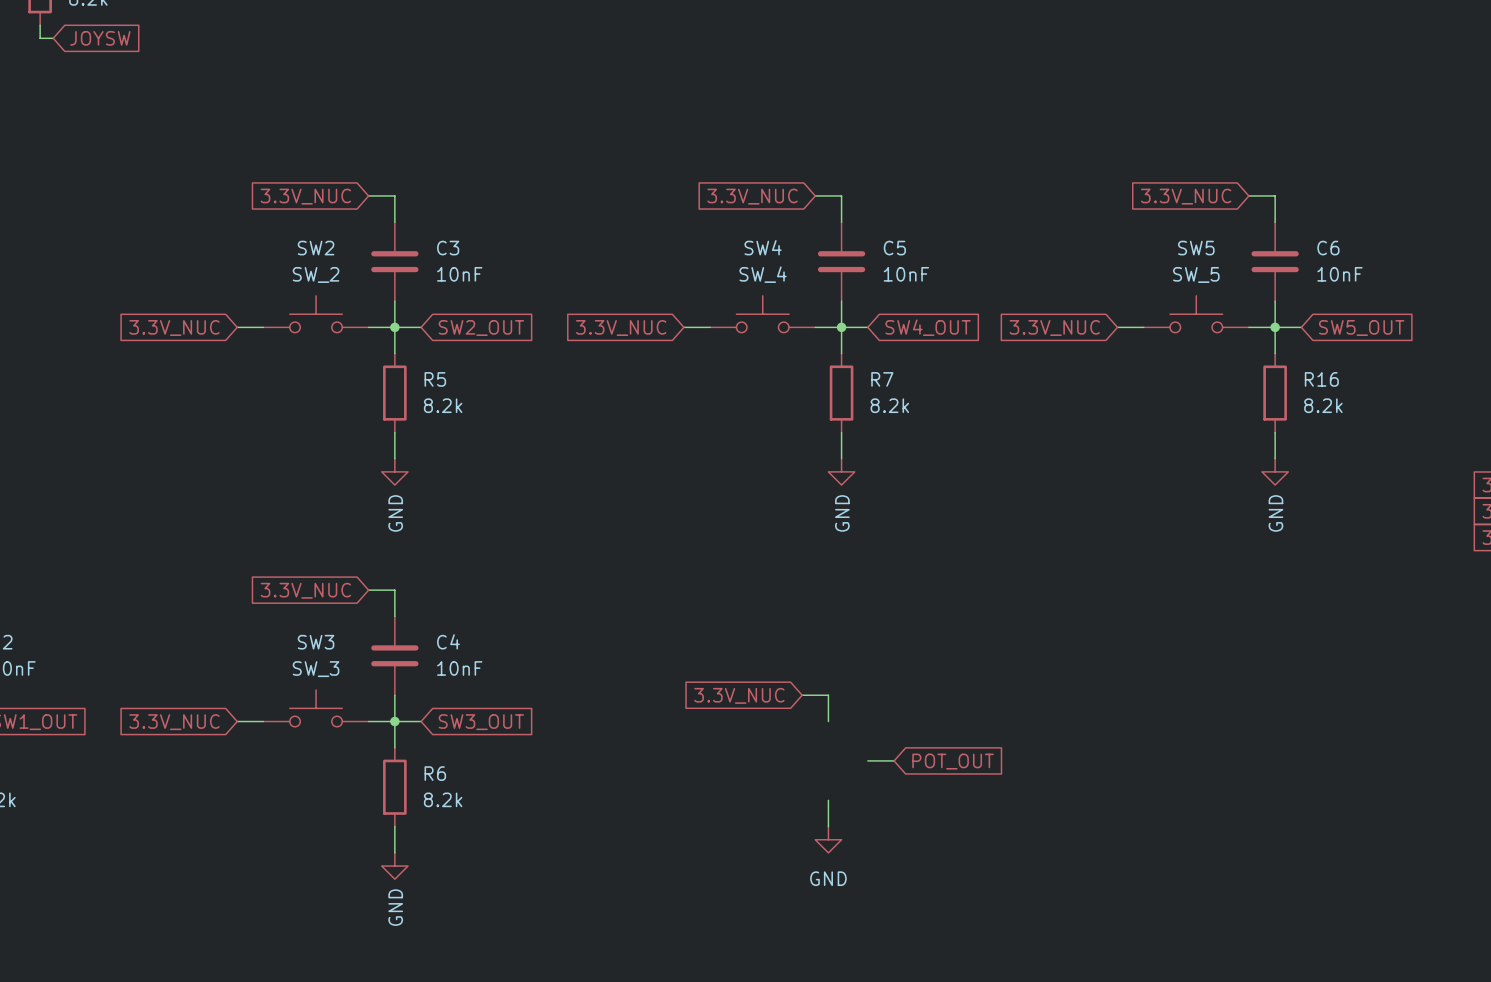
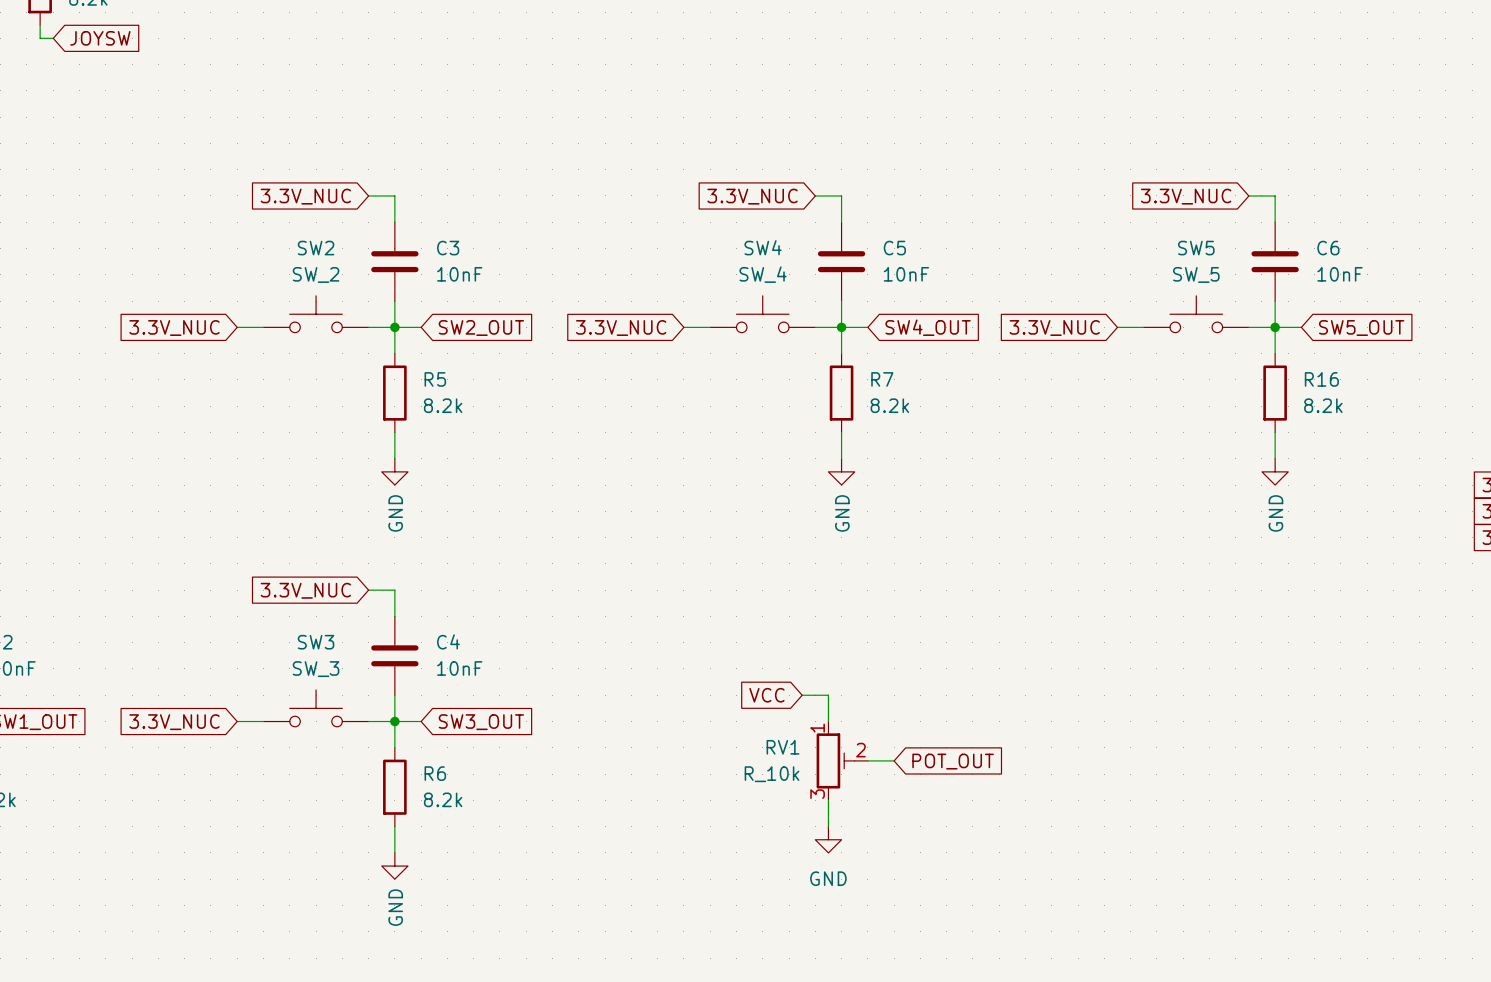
global label: 3.3V_NUC (739, 695) -> VCC (766, 695)
RV1: none -> R_10k (842, 760)

